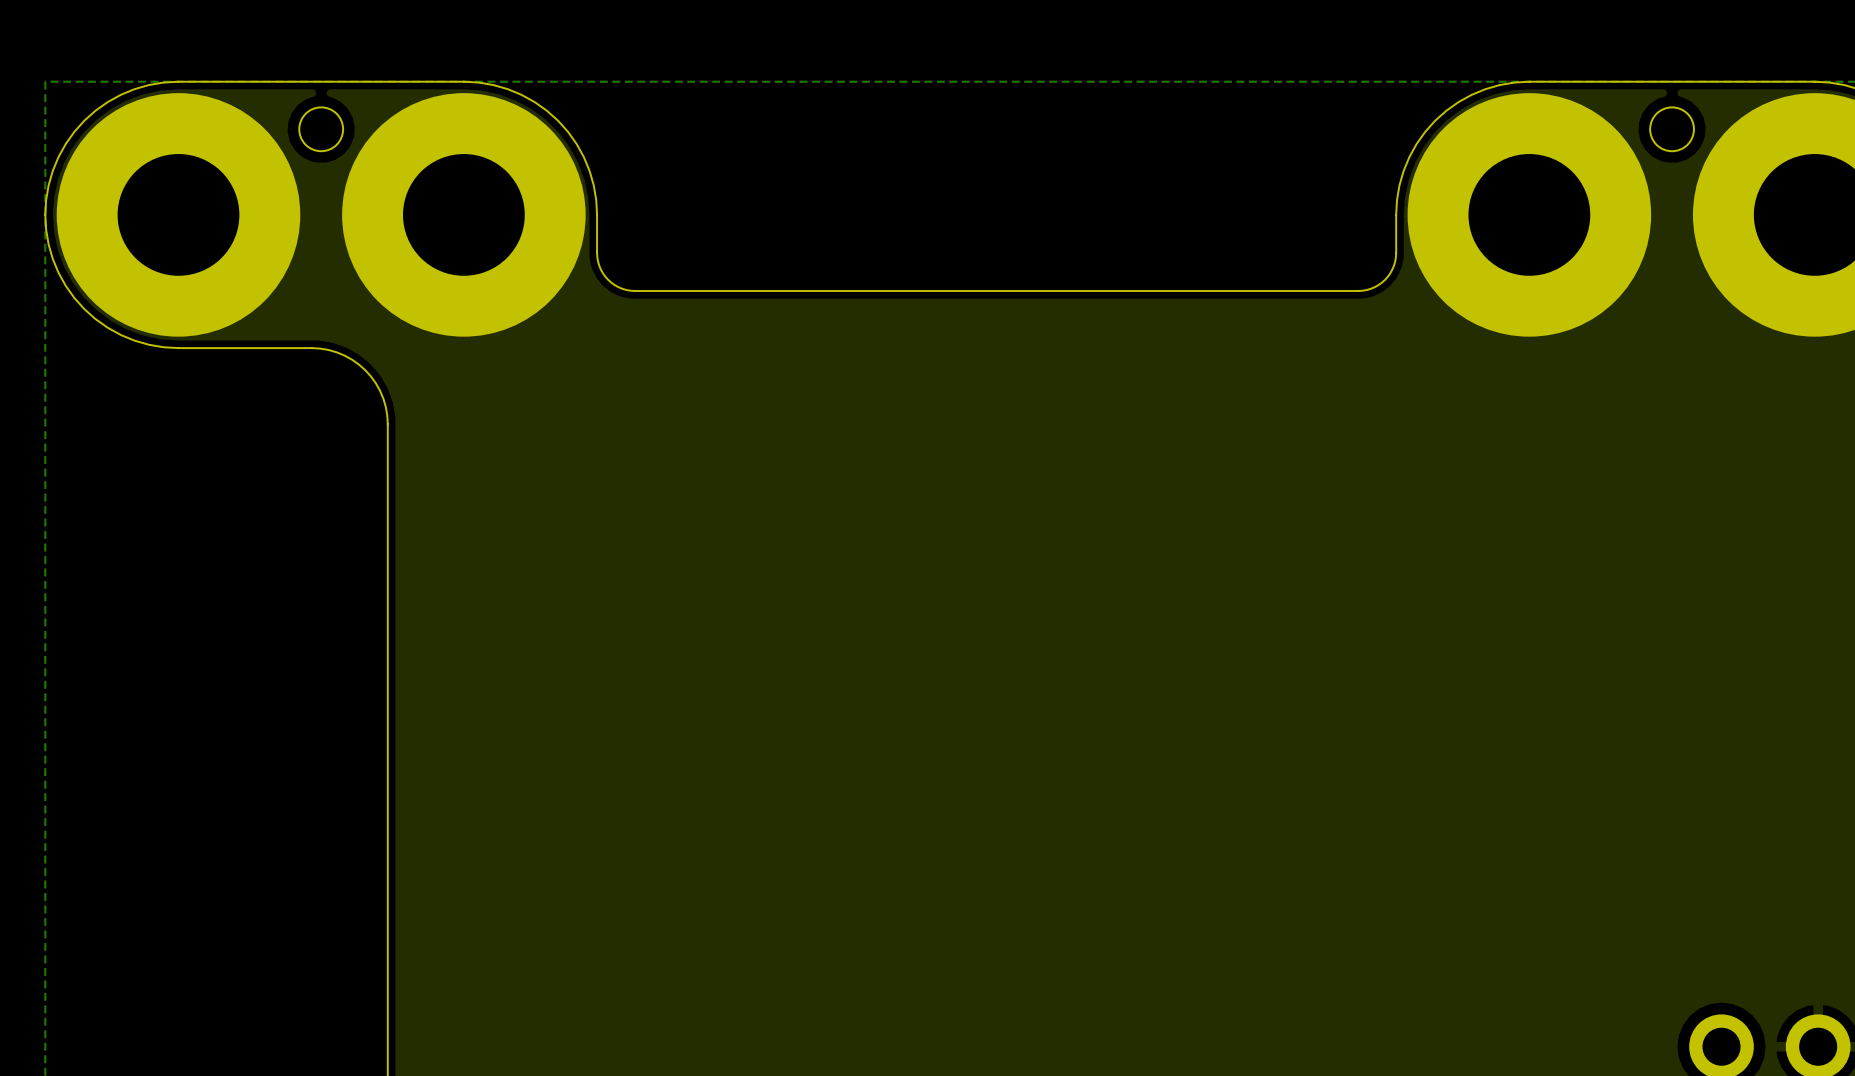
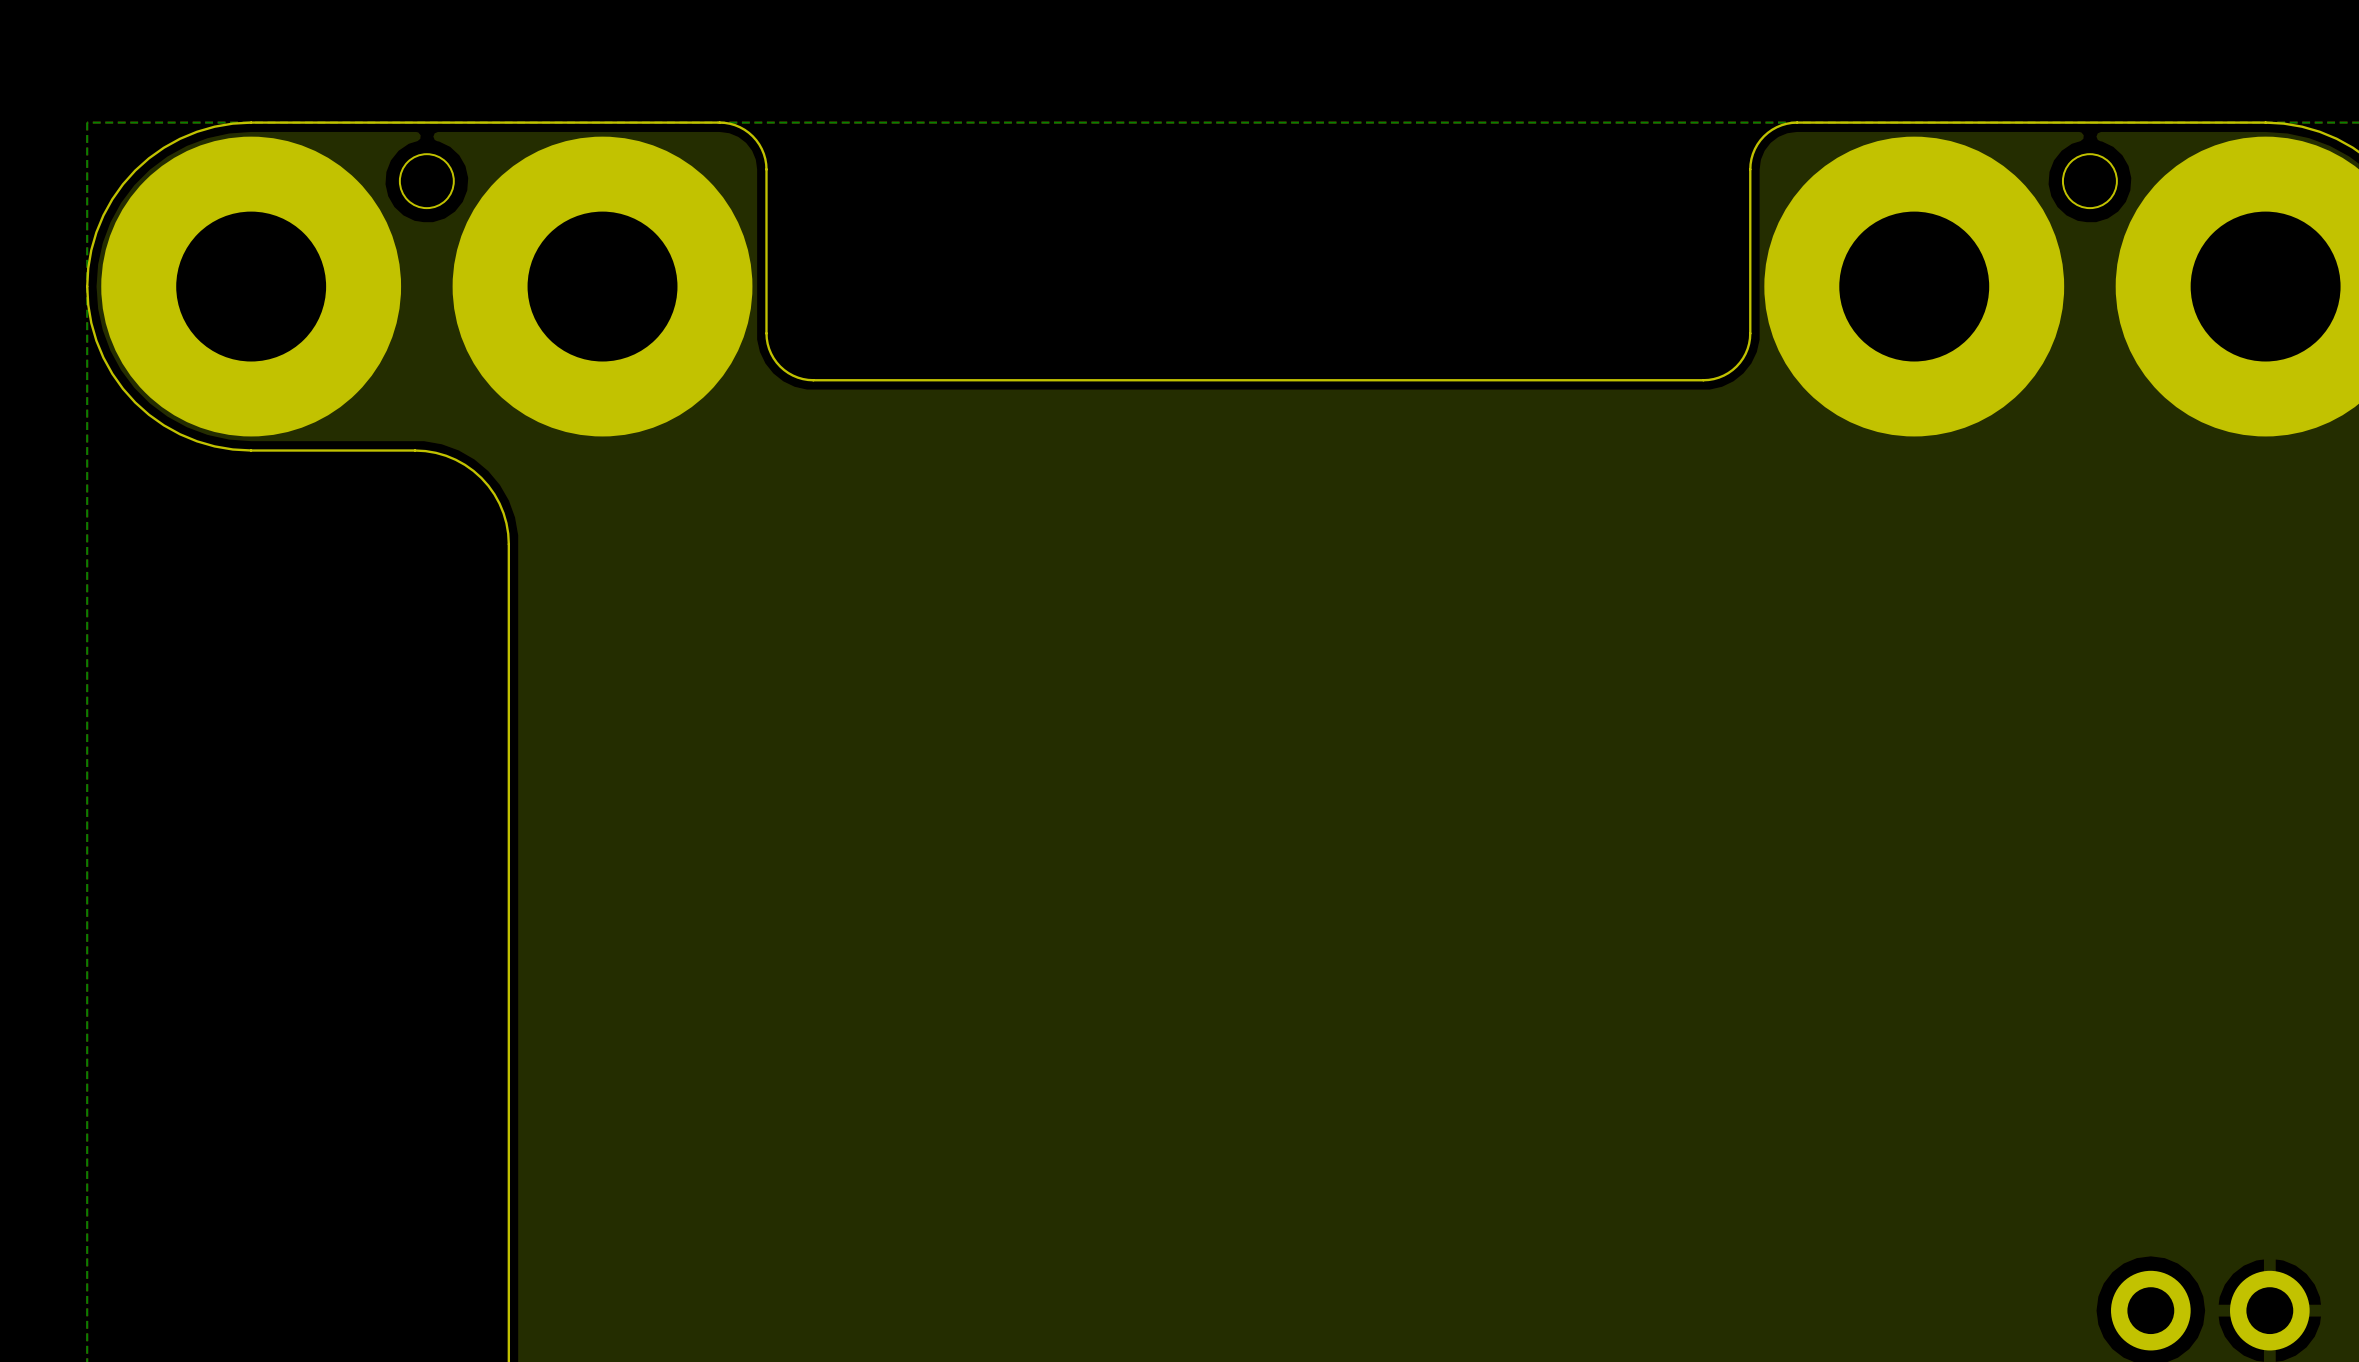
board edge: (463, 81) (493, 85) (521, 94) (546, 110) (558, 120) (576, 144) (589, 170) (596, 200) (597, 214) -> (602, 122) (724, 122) (739, 127) (752, 136) (761, 149) (766, 164) (766, 286)
board edge: (1529, 81) (1499, 85) (1485, 89) (1458, 102) (1435, 120) (1416, 144) (1403, 170) (1397, 200) (1396, 214) -> (1914, 122) (1791, 122) (1776, 127) (1764, 136) (1754, 149) (1750, 164) (1750, 286)

